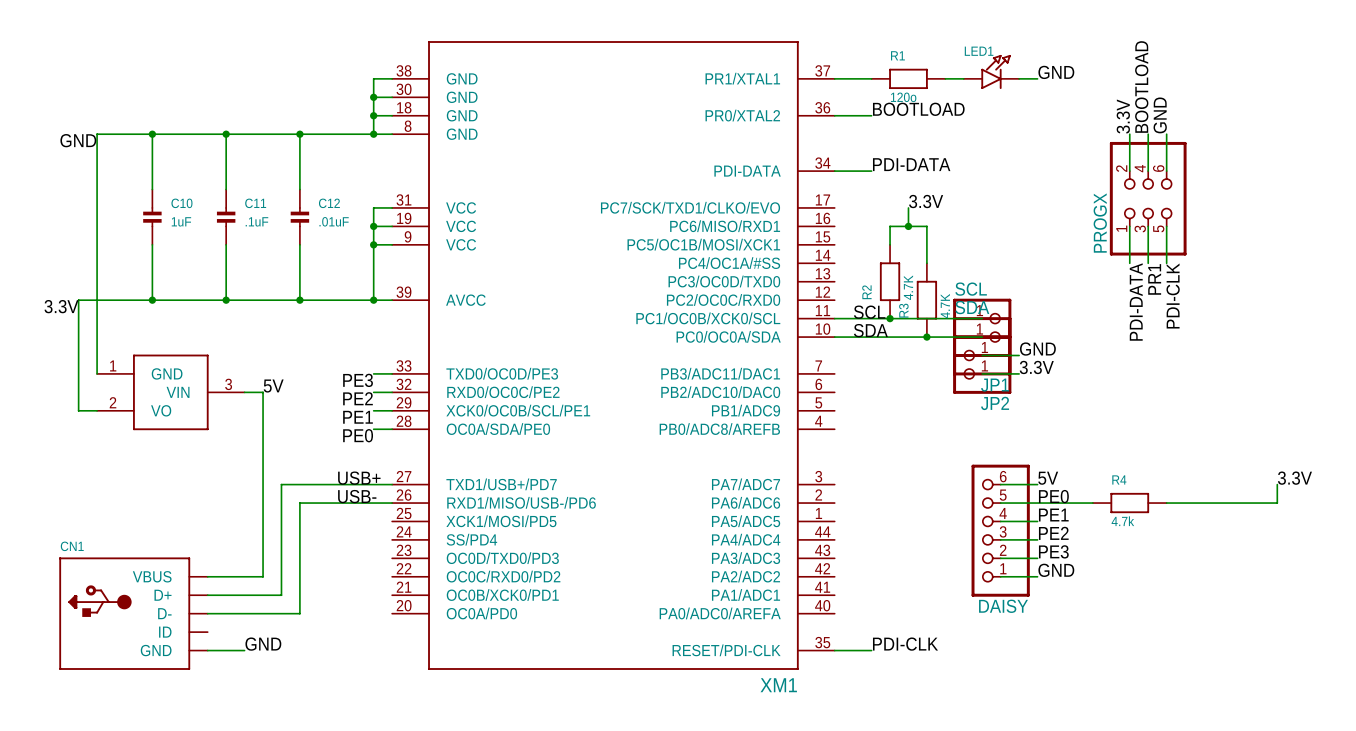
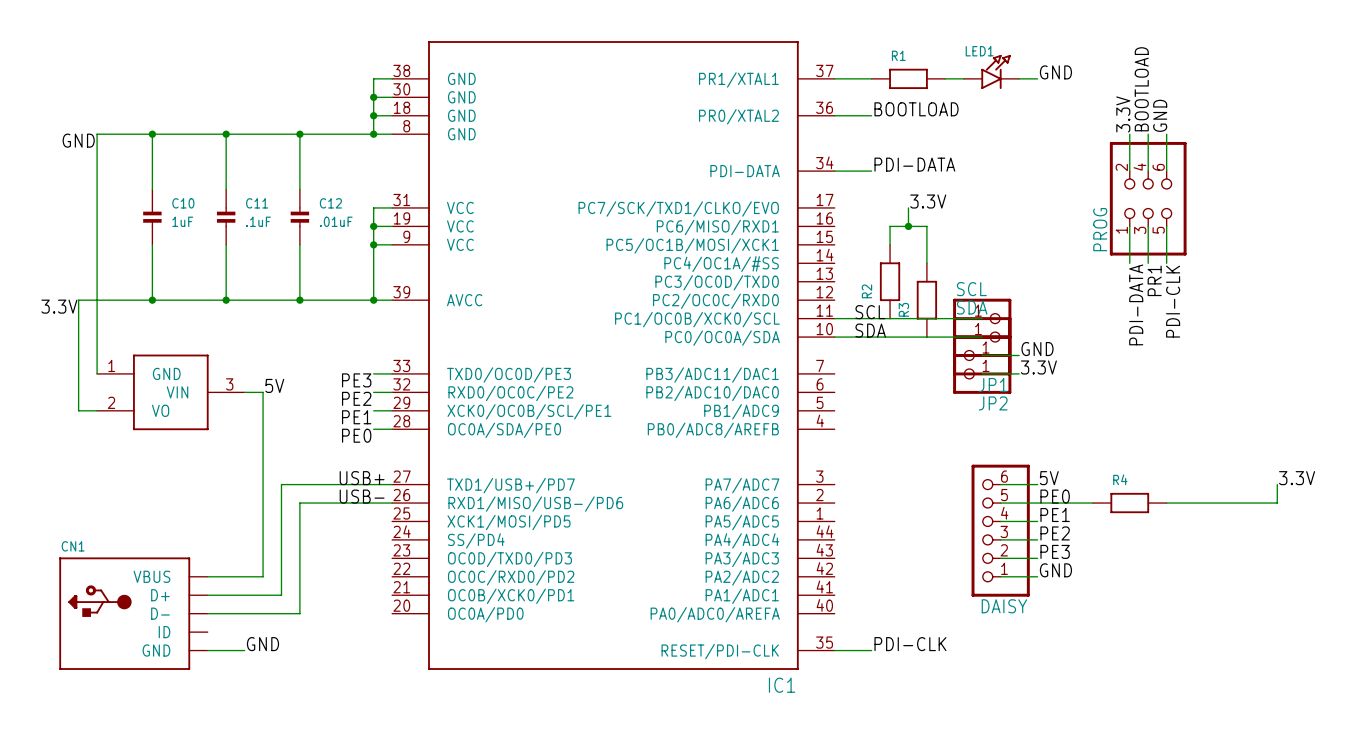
R1 value: 120o (903, 97) -> none
PROGX name: PROGX (1100, 223) -> PROG (1100, 229)
R2 value: 4.7K (908, 287) -> none
R3 value: 4.7K (945, 306) -> none
junction: (890, 318) -> none
junction: (926, 337) -> none
R4 value: 4.7k (1122, 521) -> none
XM1 name: XM1 (778, 685) -> IC1 (782, 685)

